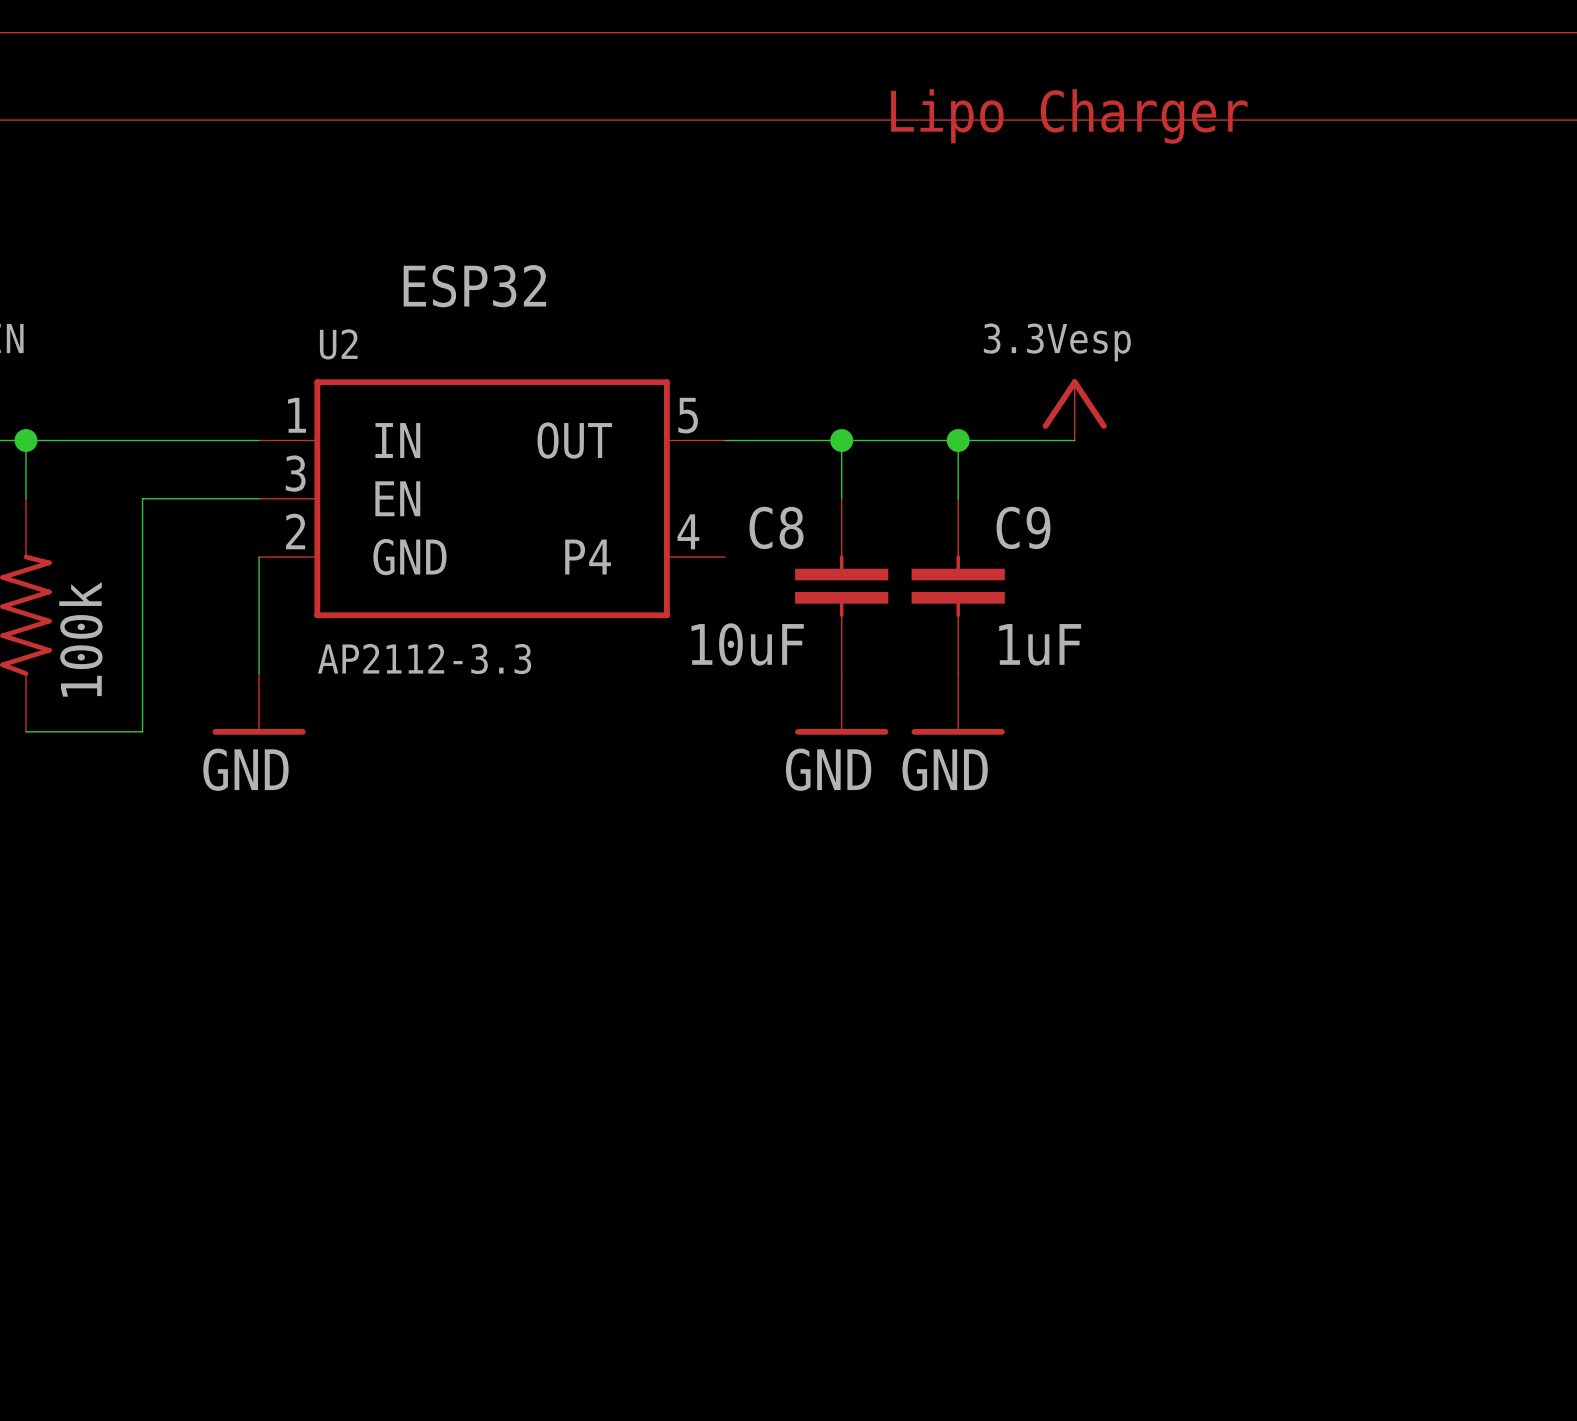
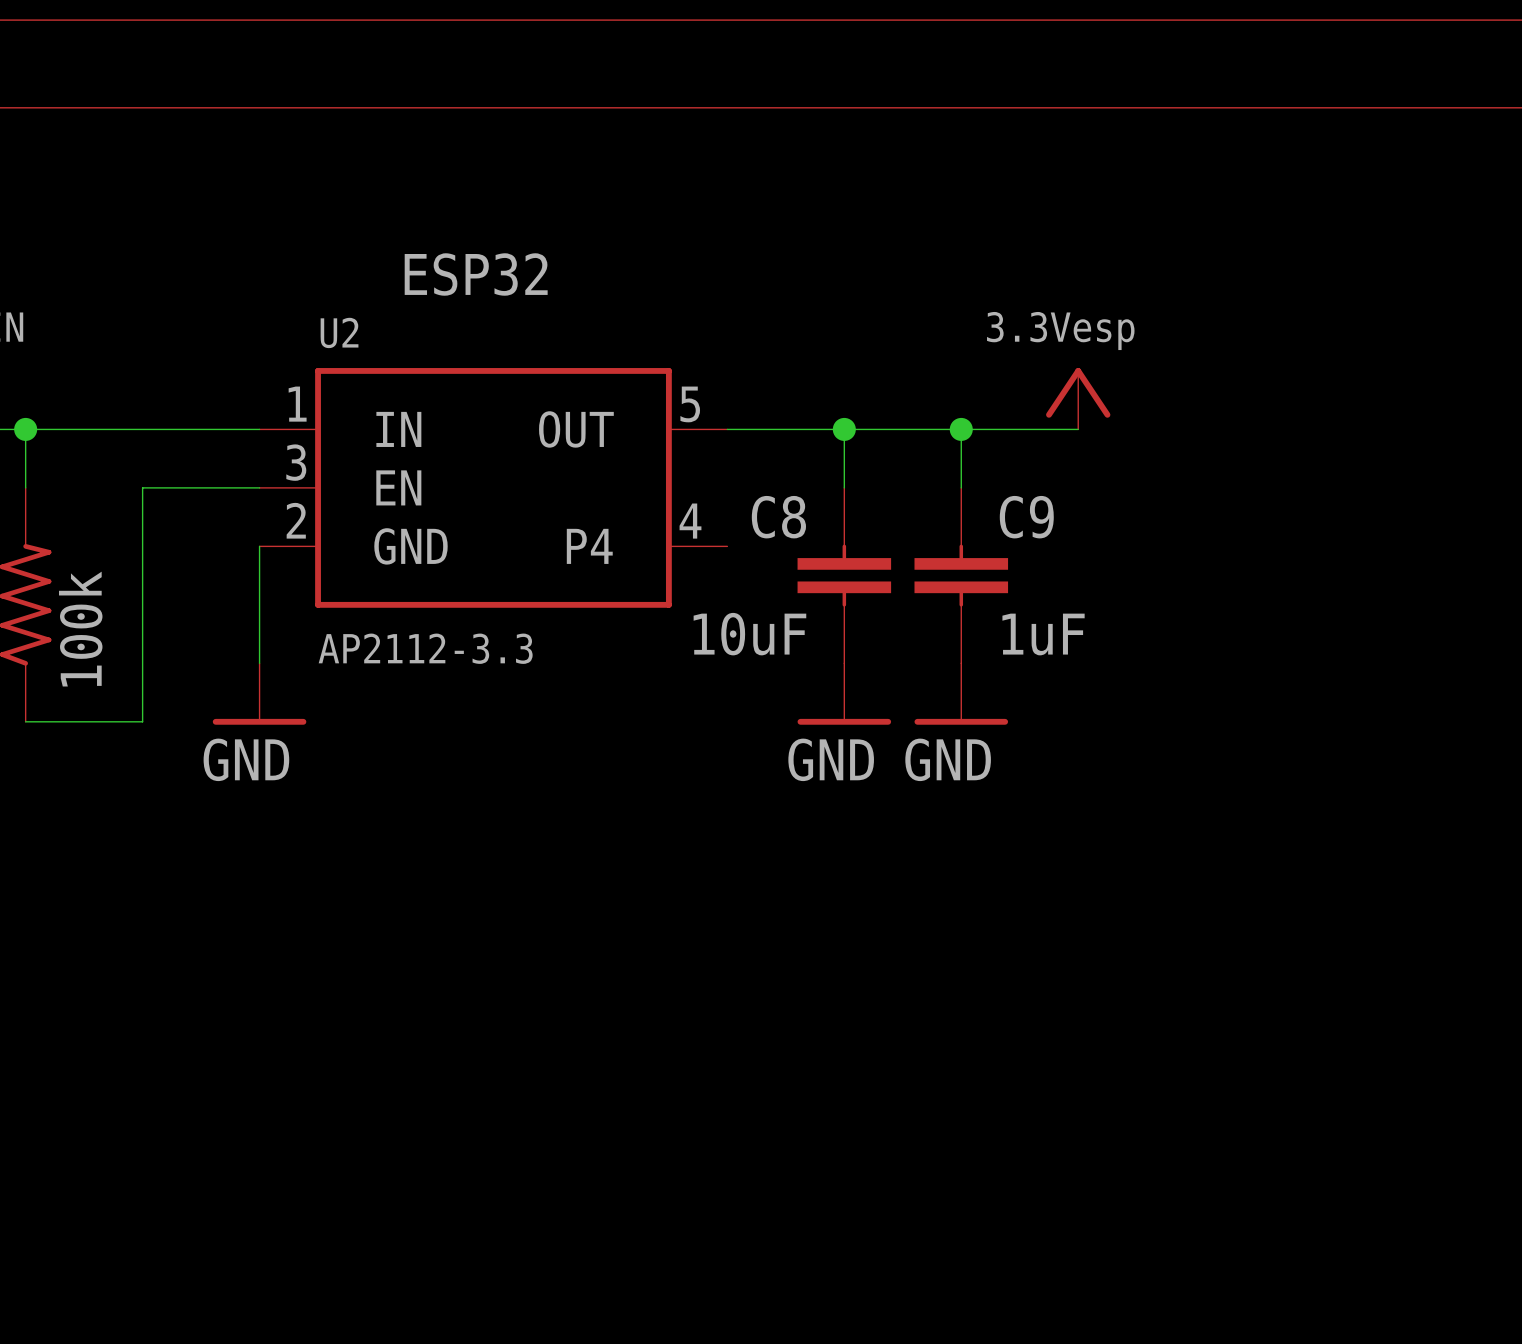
text: Lipo Charger (1069, 116) -> none

